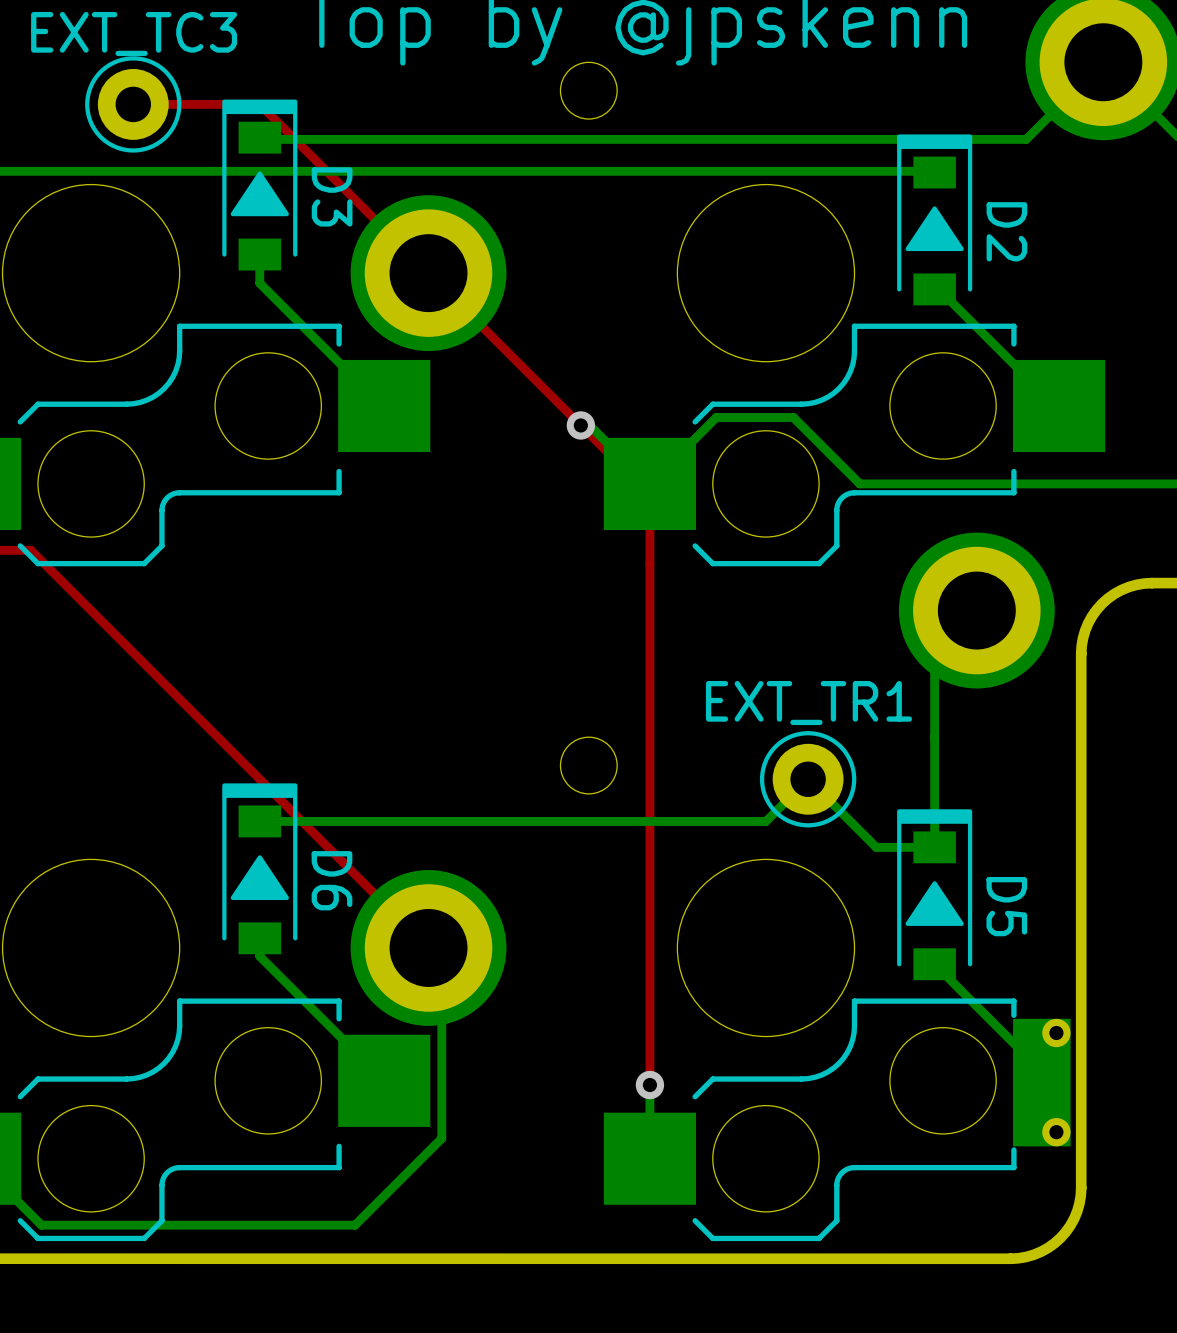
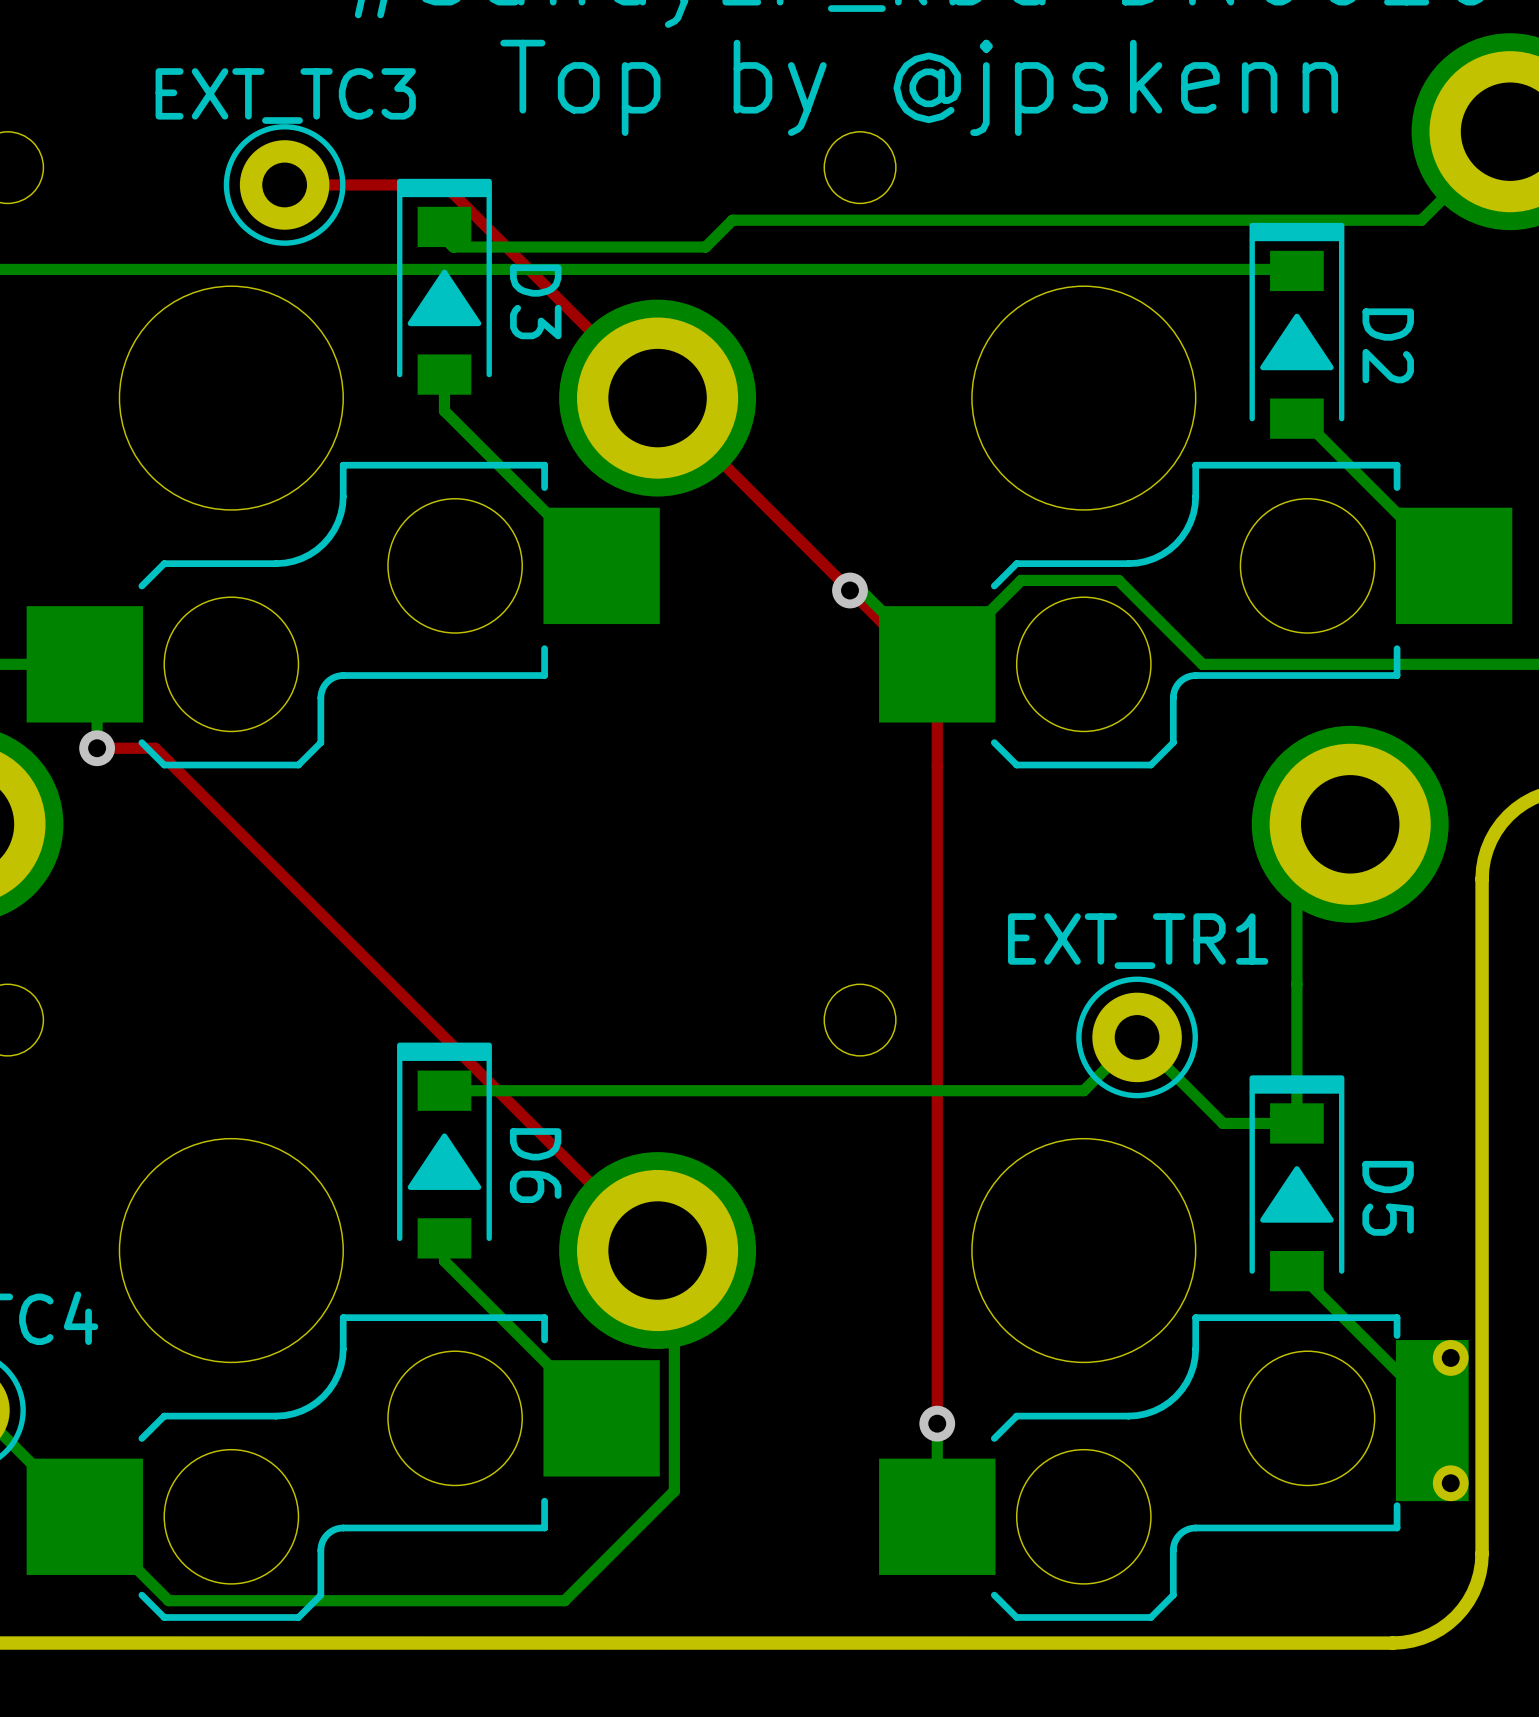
bottom track: (1033, 132) (1026, 139) (261, 139) (259, 137) -> (1421, 220) (732, 220) (705, 247) (453, 247) (444, 238)

